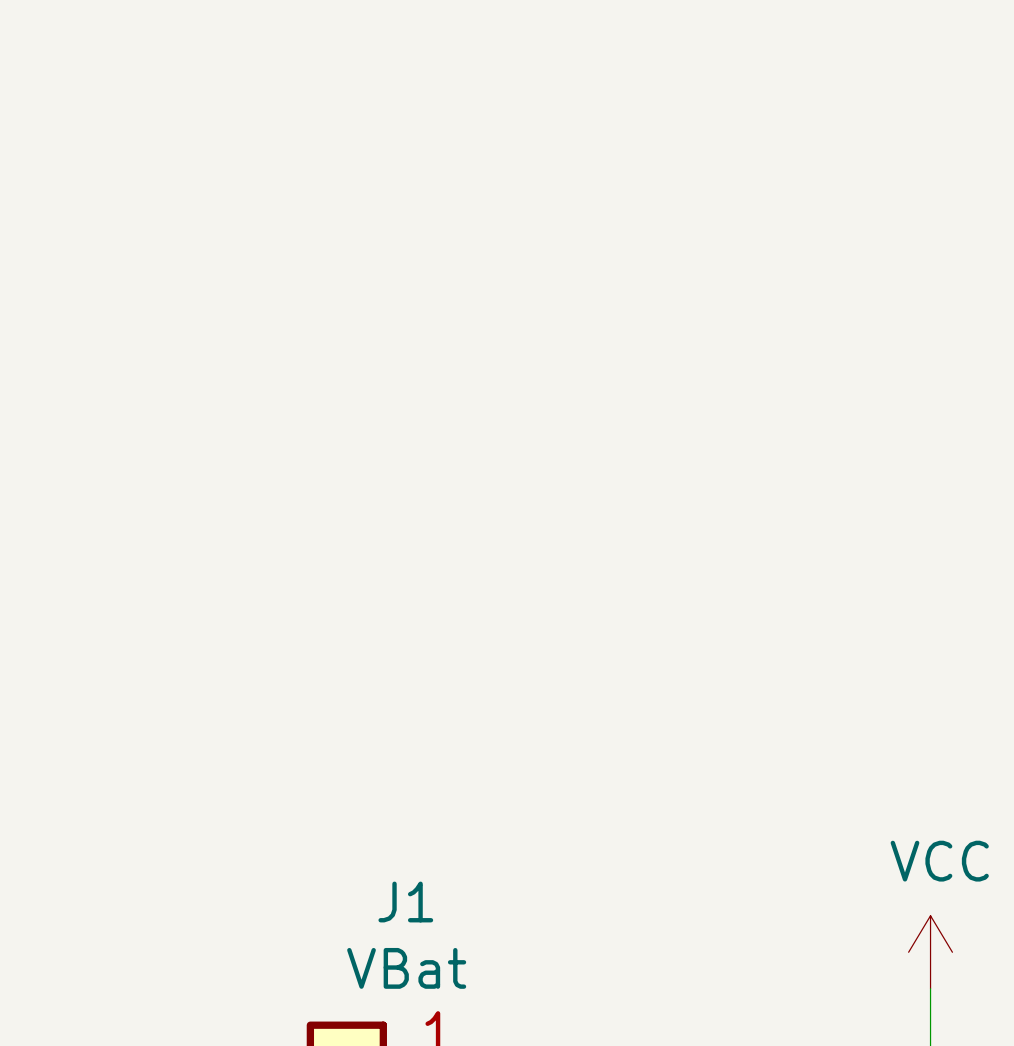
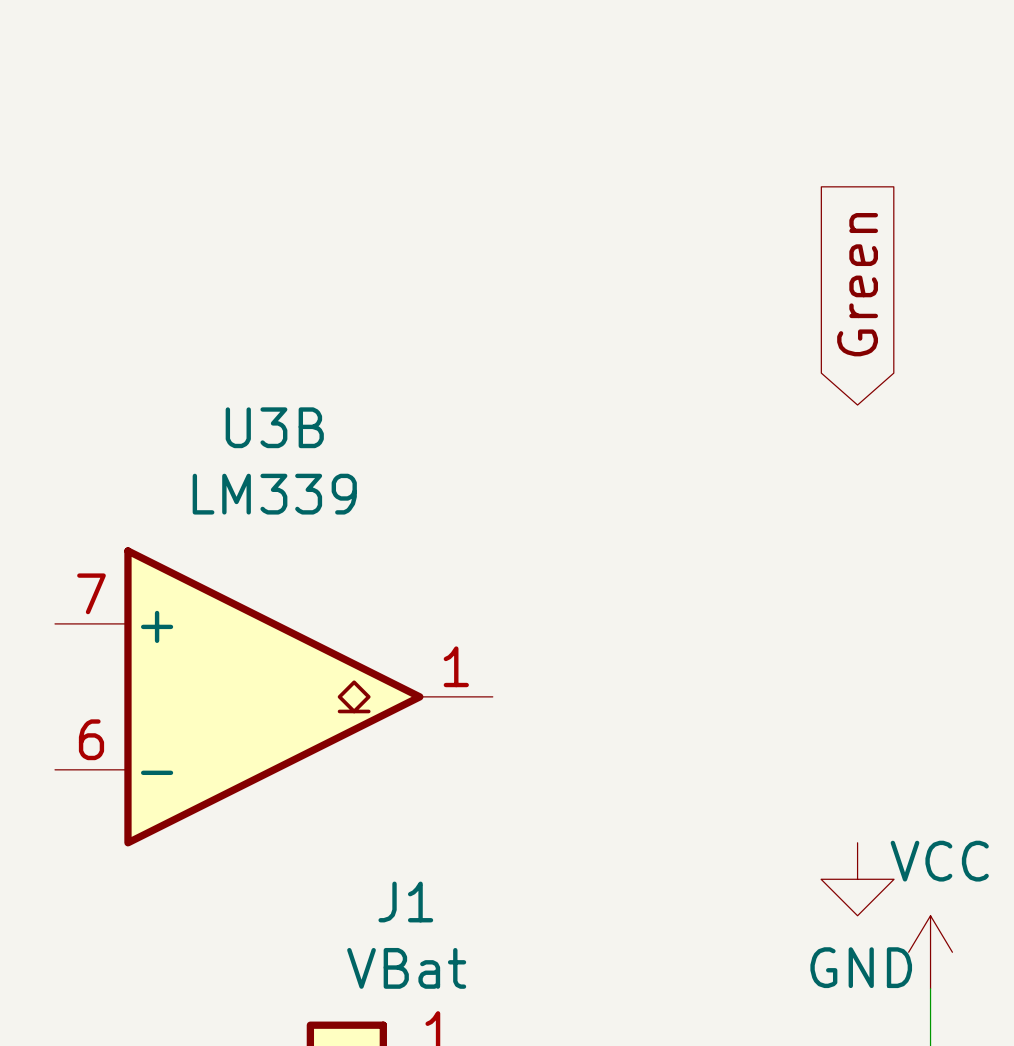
global label: none -> Green (857, 284)
U3B: none -> LM339 (273, 696)
power symbol: none -> GND (857, 879)

